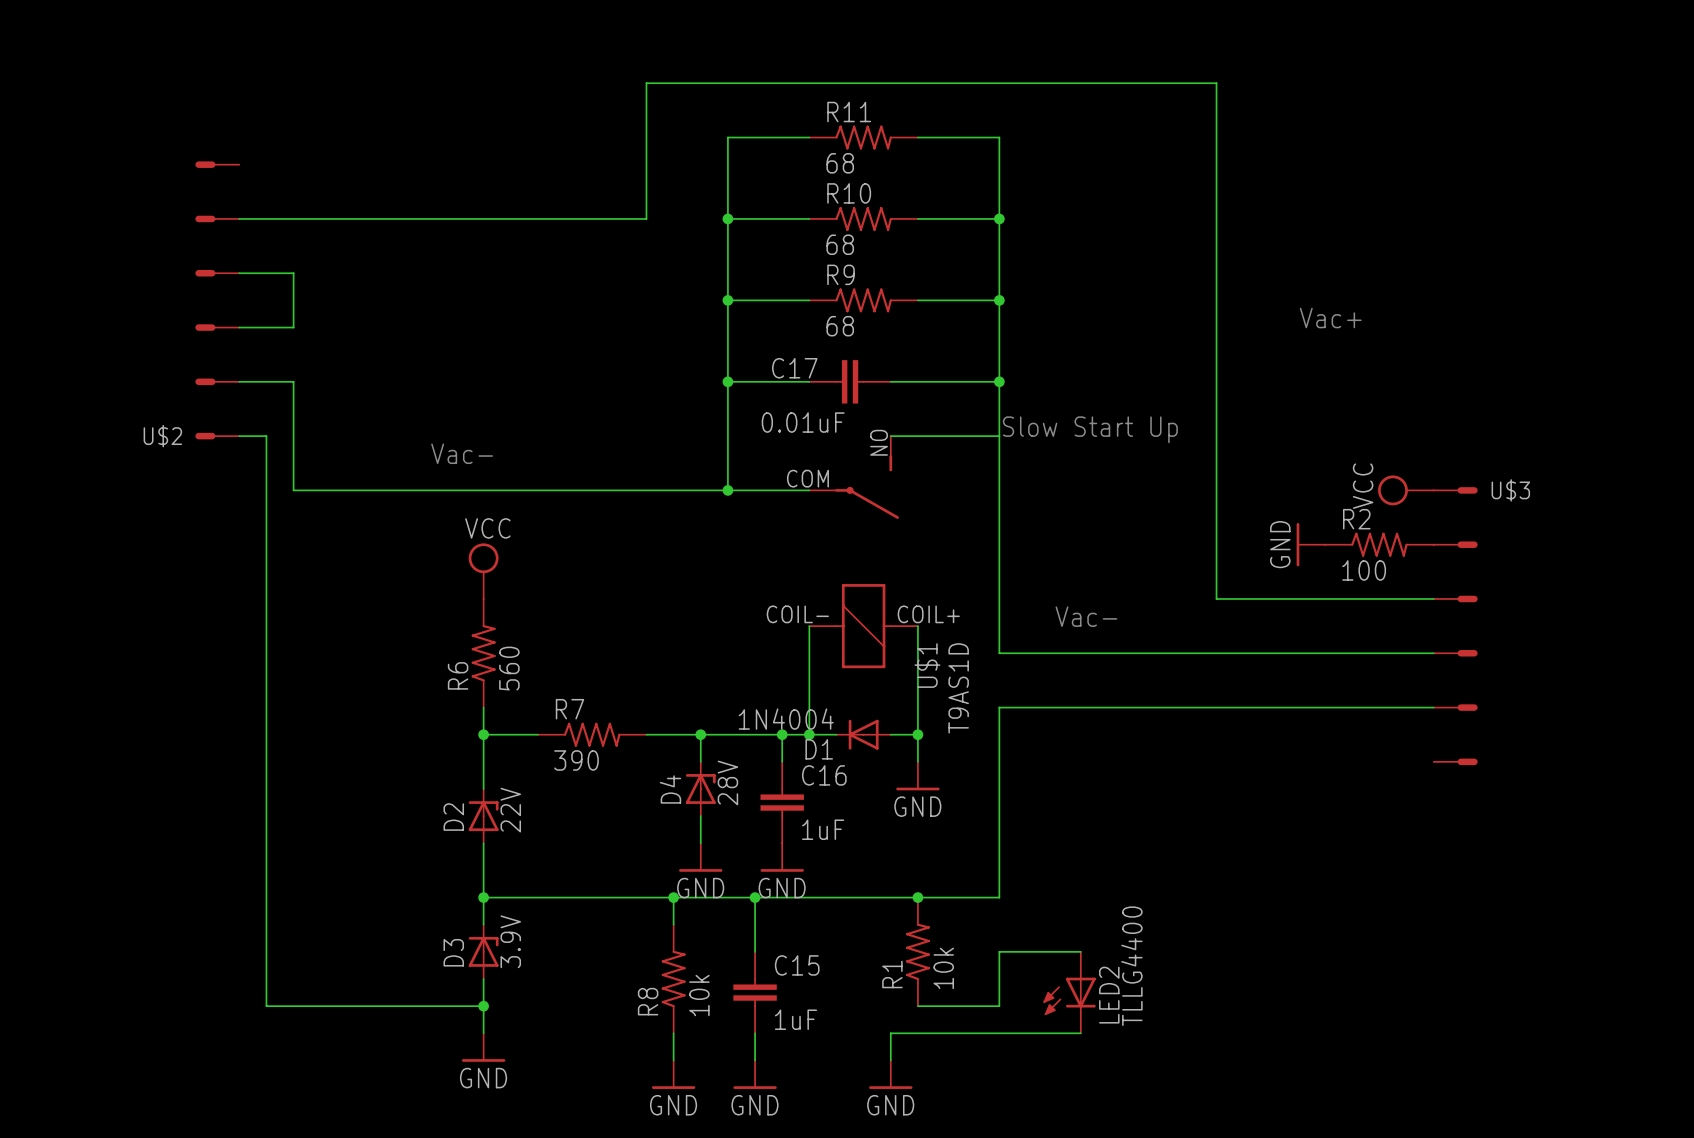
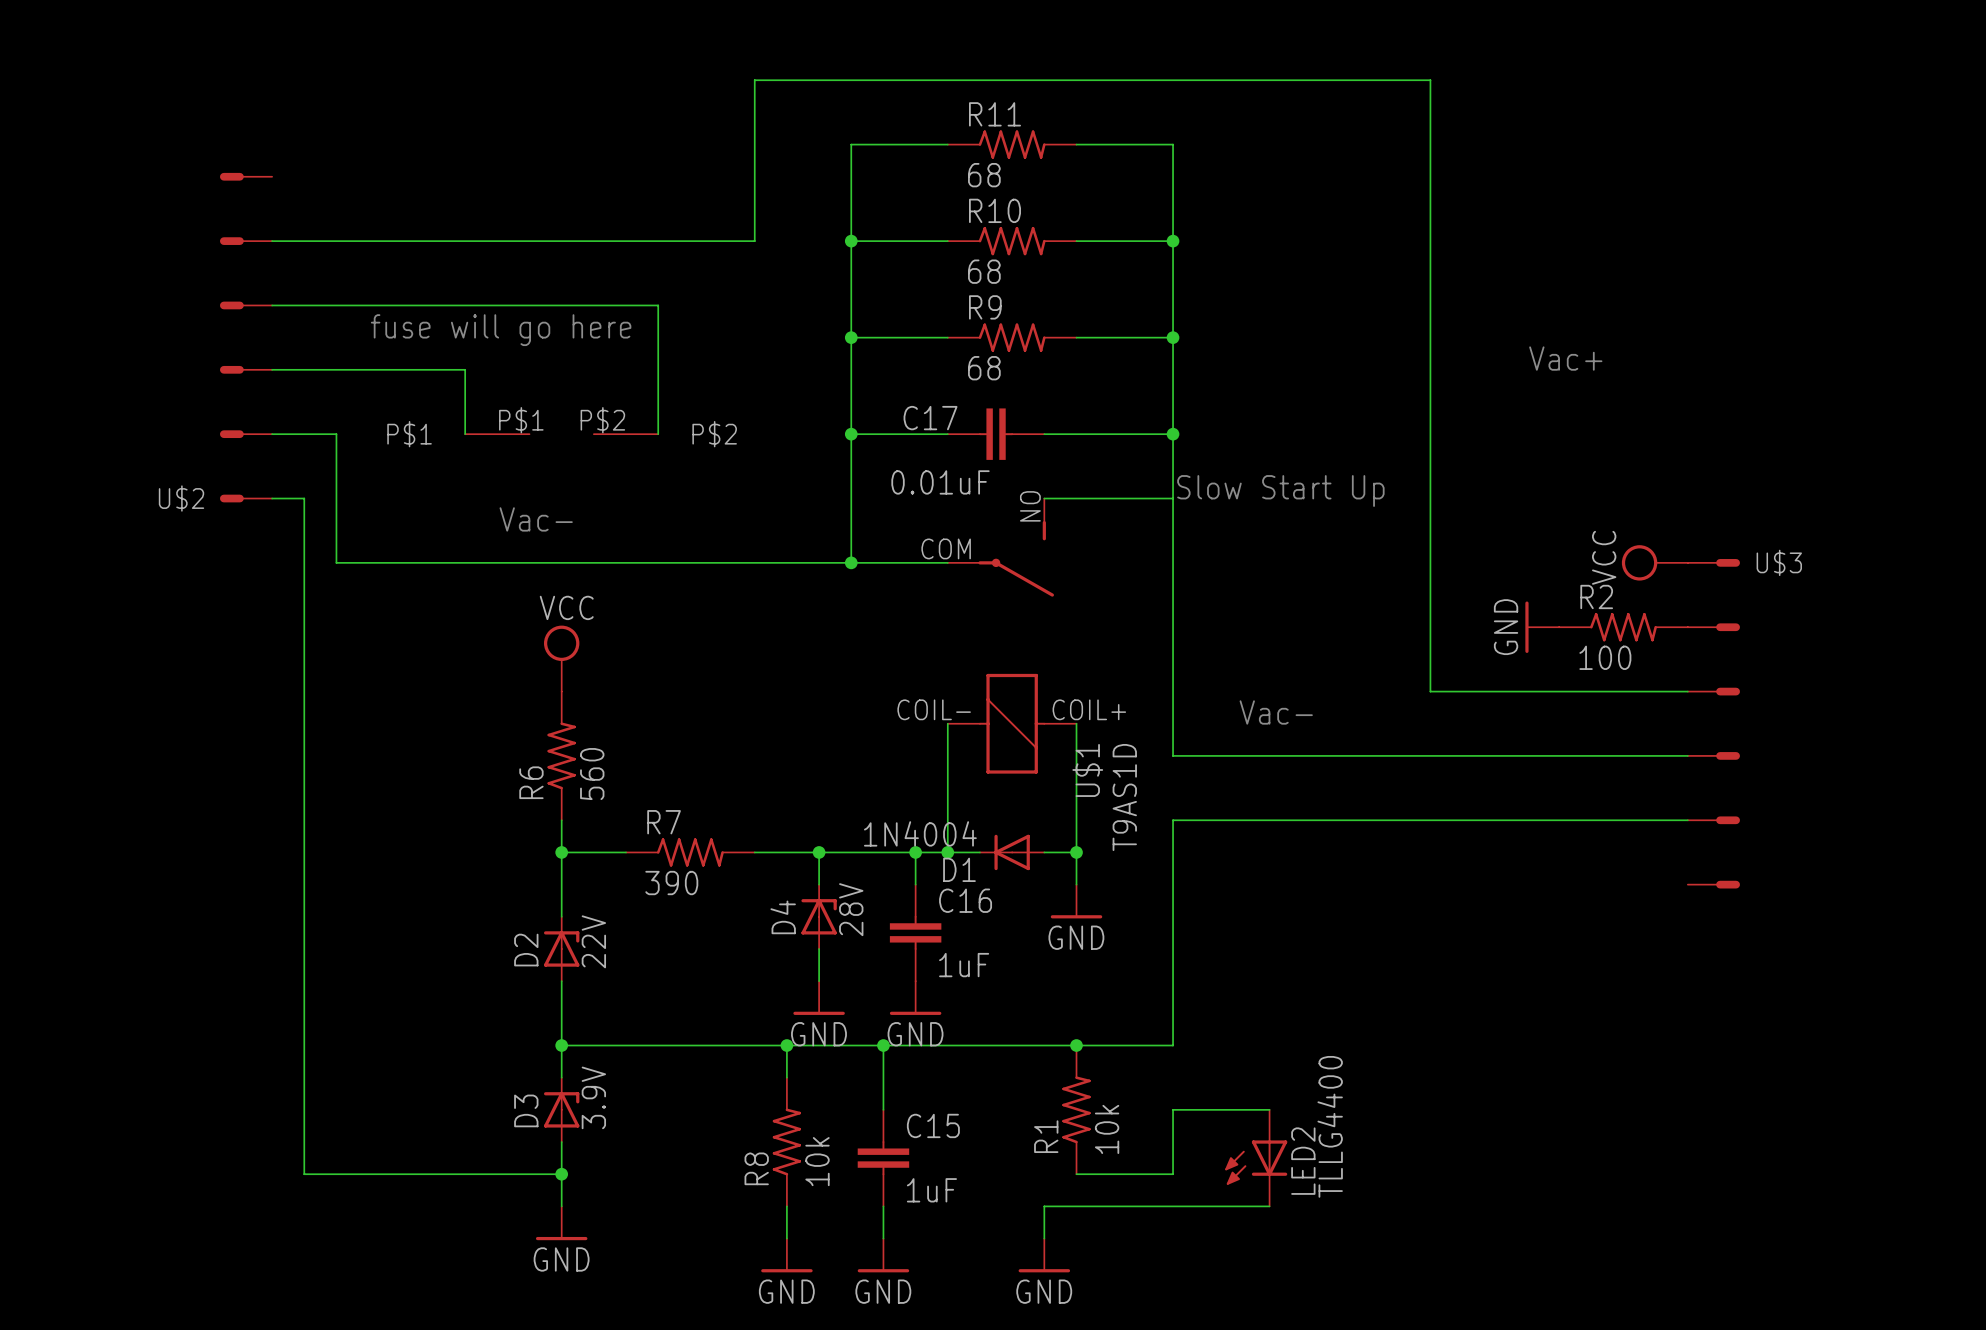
wire: (293, 273) (293, 327) -> (465, 434) (465, 369) (336, 369)
wire: none -> (336, 305) (658, 305) (658, 434)
text: none -> fuse will go here (501, 330)
part: none -> (561, 434)

